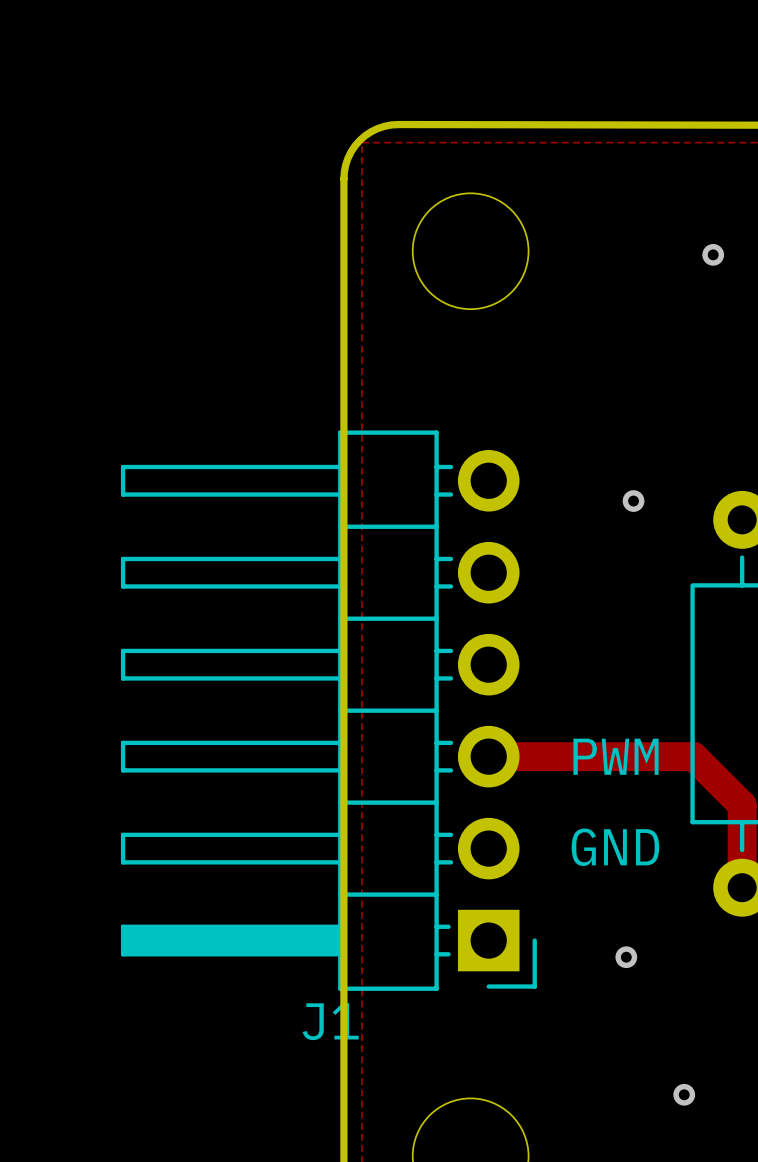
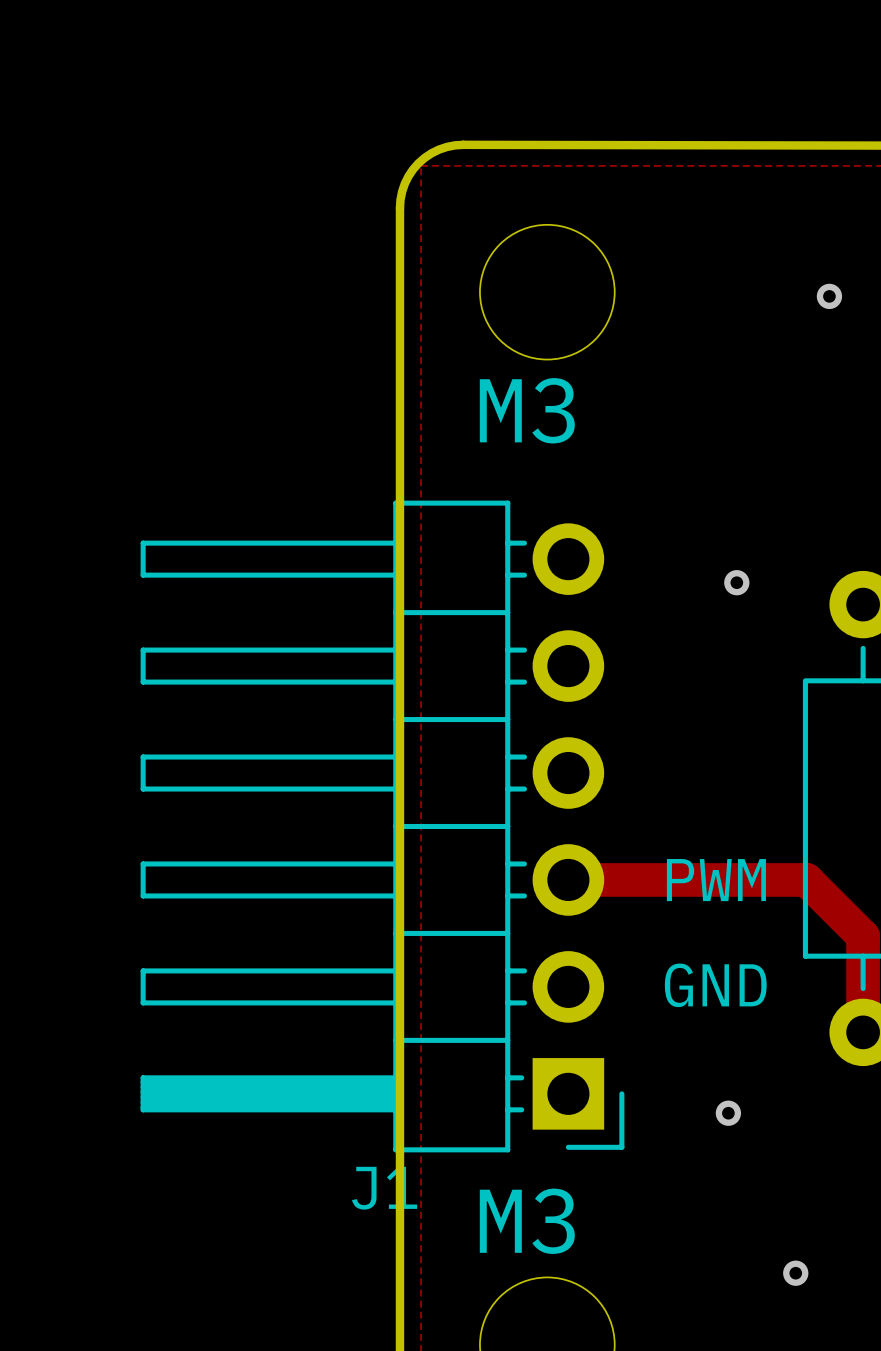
text: none -> M3 (527, 410)
text: none -> M3 (527, 1221)

